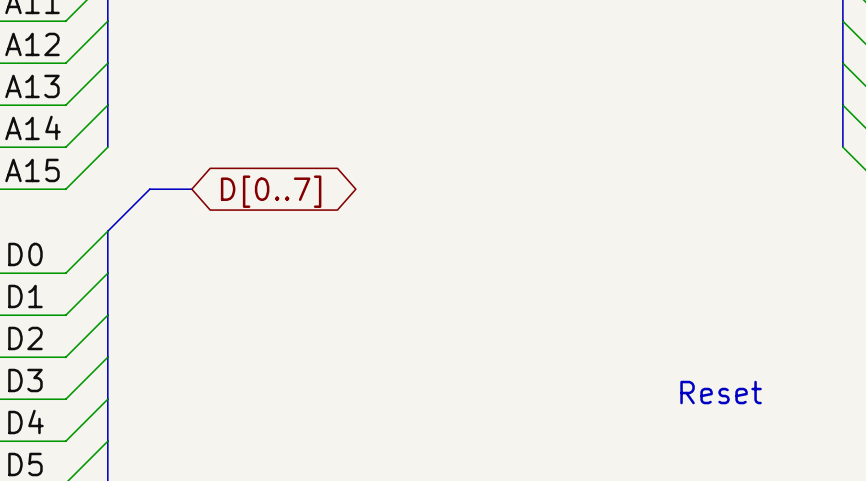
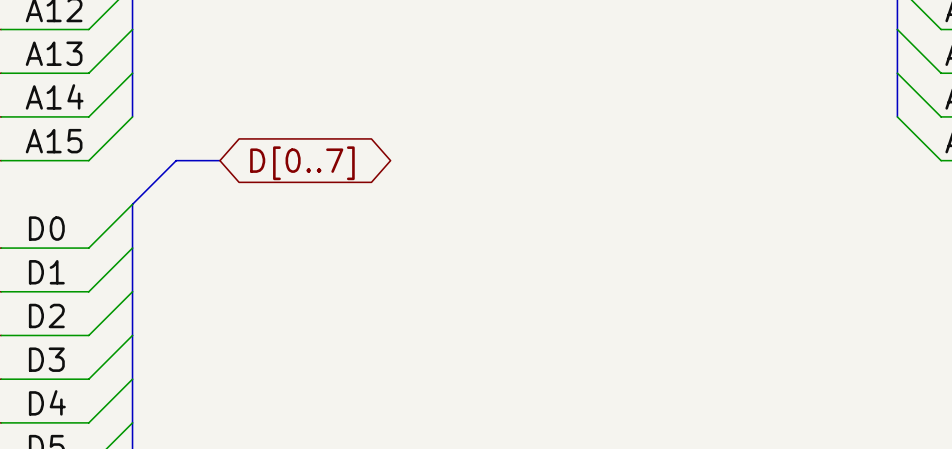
text: Reset (721, 392) -> none

